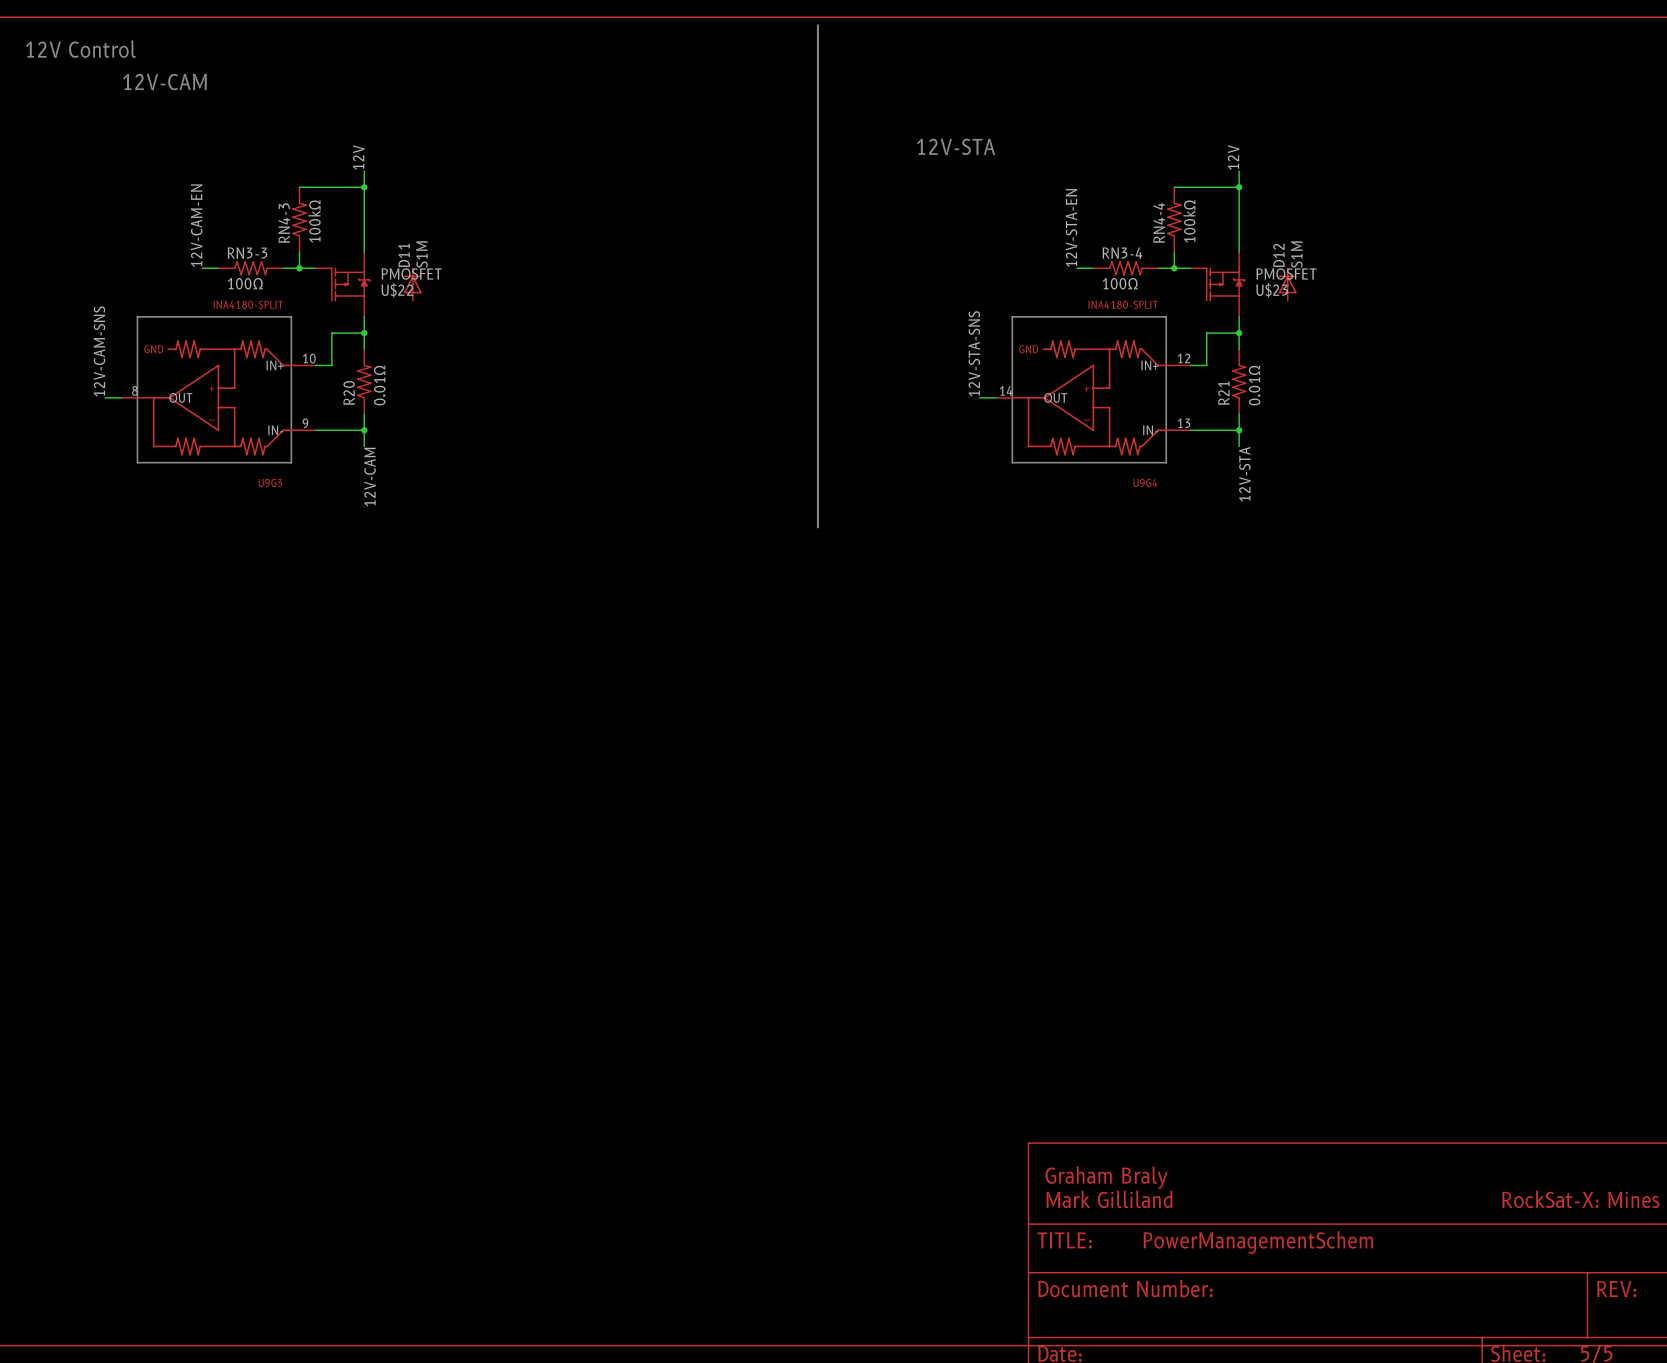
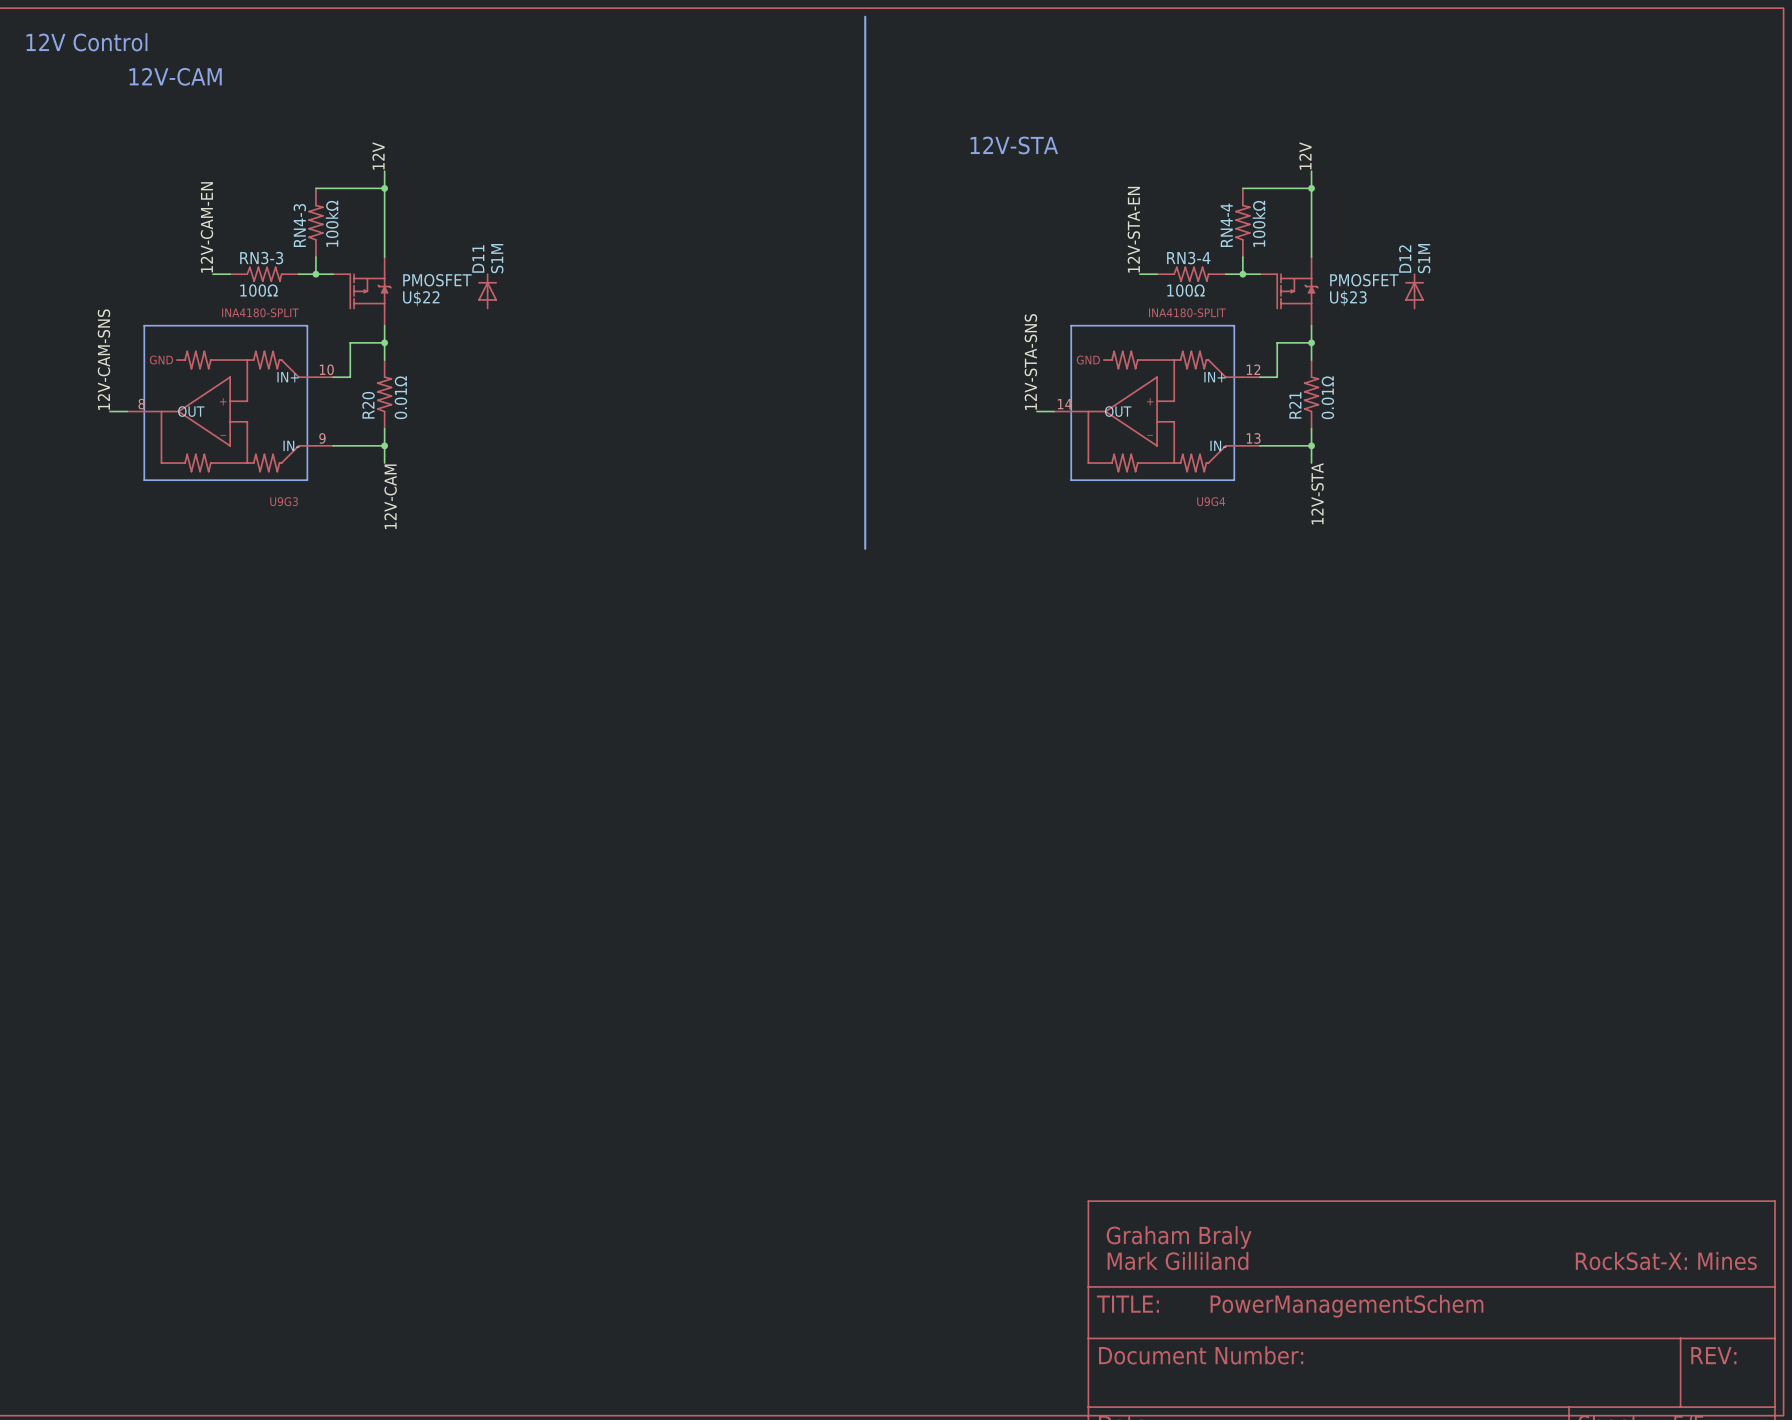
D11 position: (412, 284) -> (487, 291)
D12 position: (1287, 284) -> (1414, 291)

